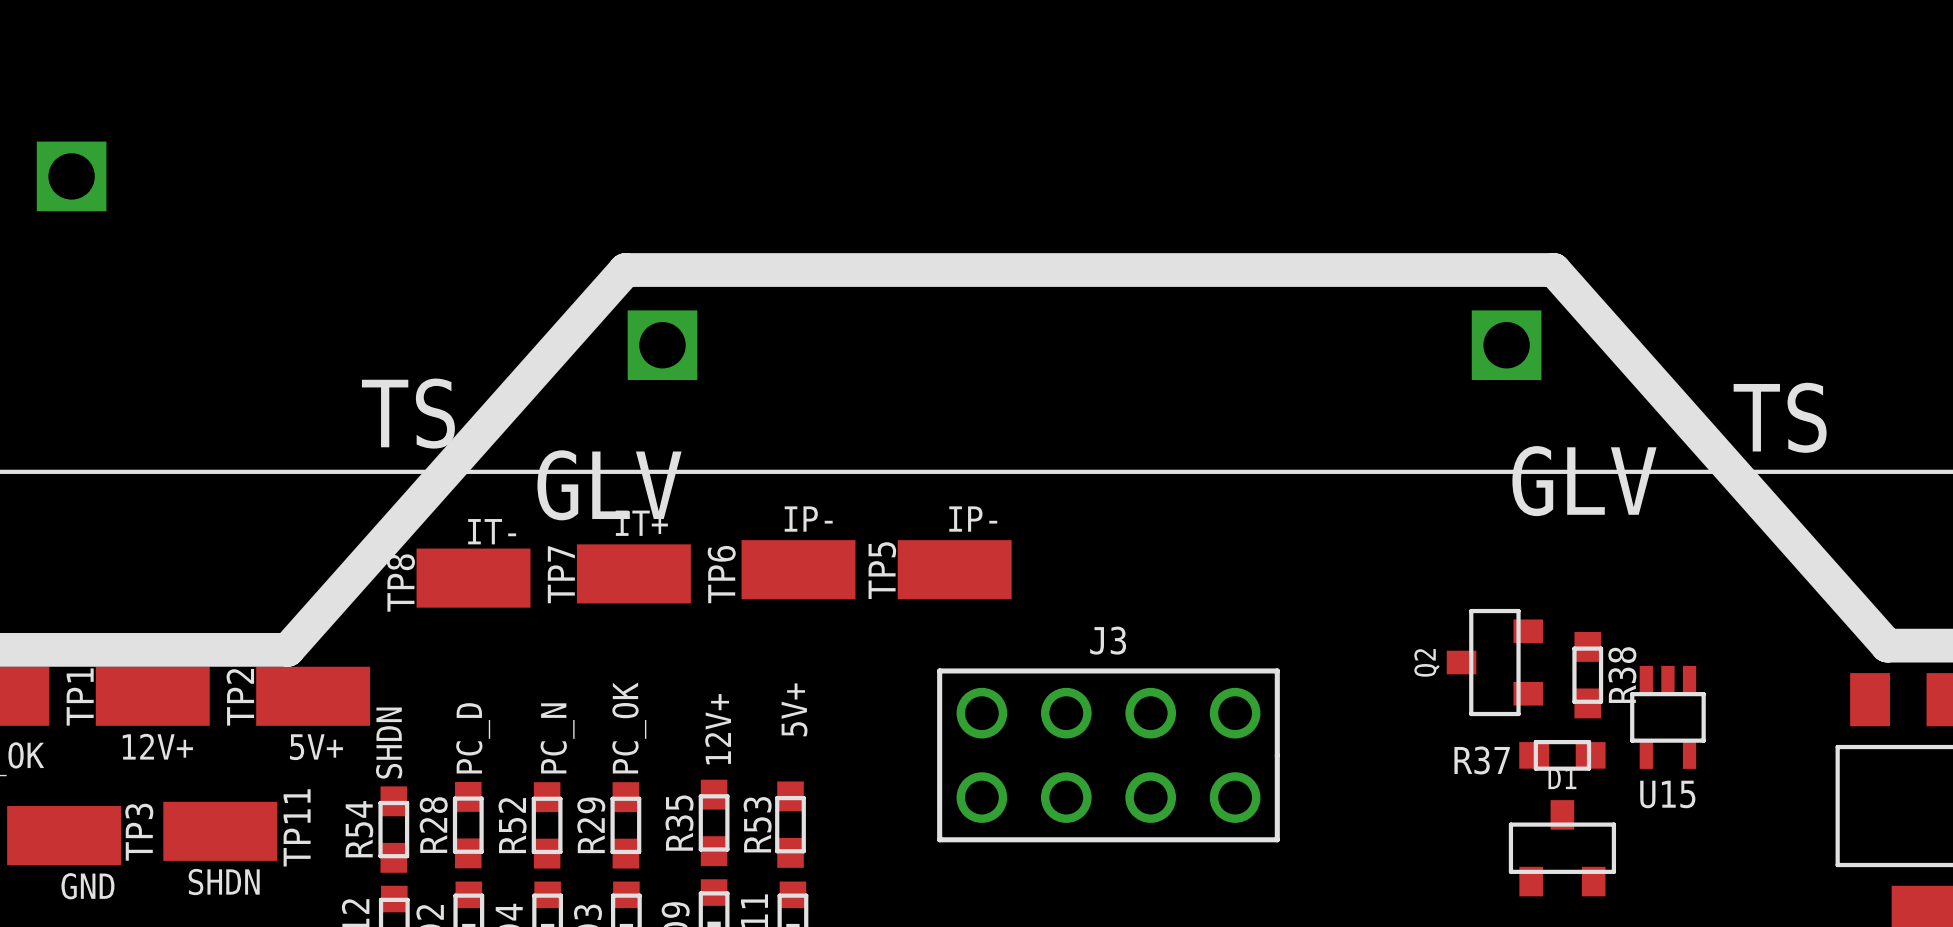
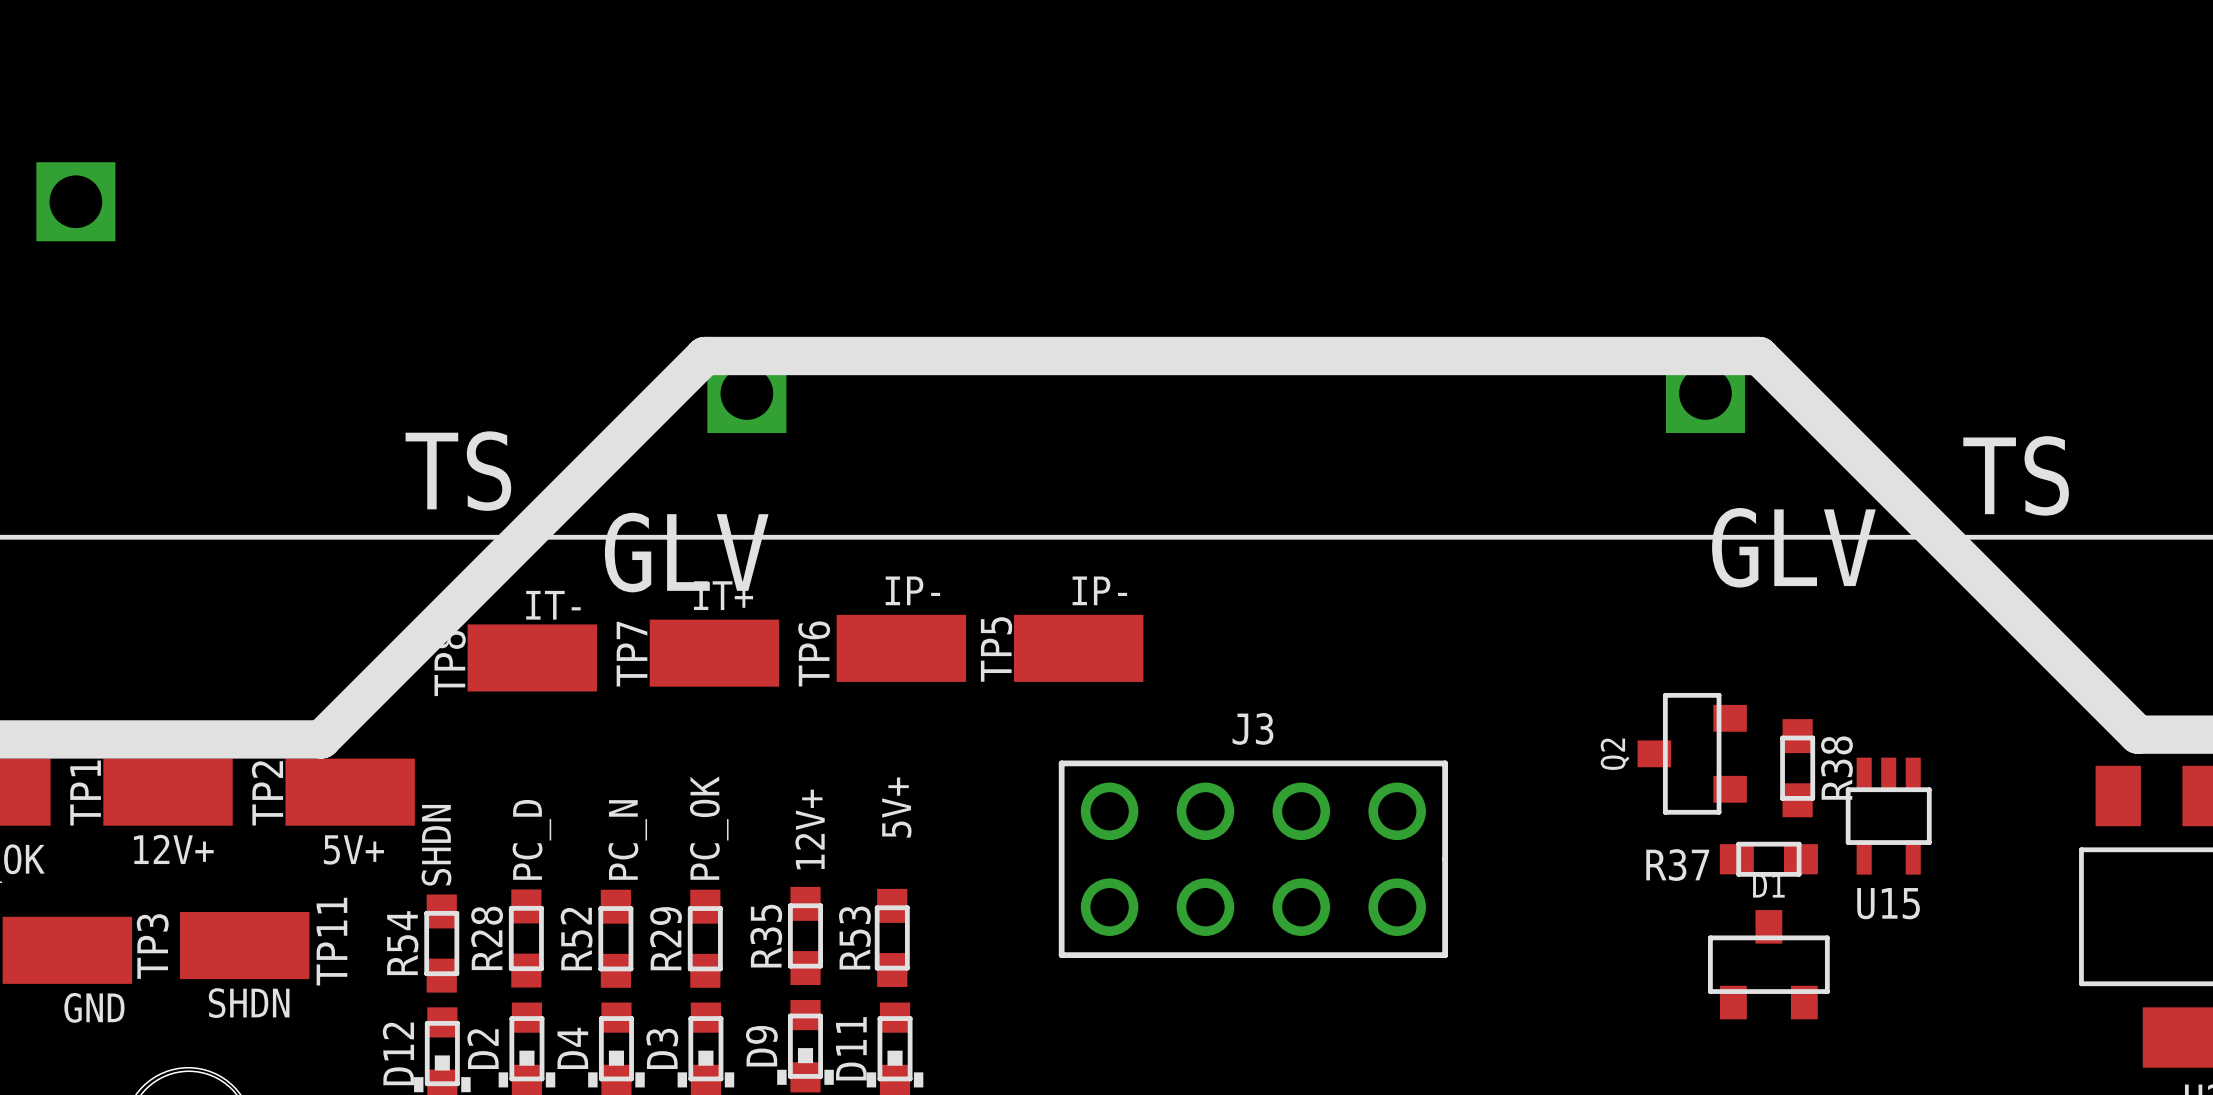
line: (1887, 645) (1553, 270) (625, 270) (287, 649) -> (2137, 734) (1759, 356) (704, 356) (321, 739)

